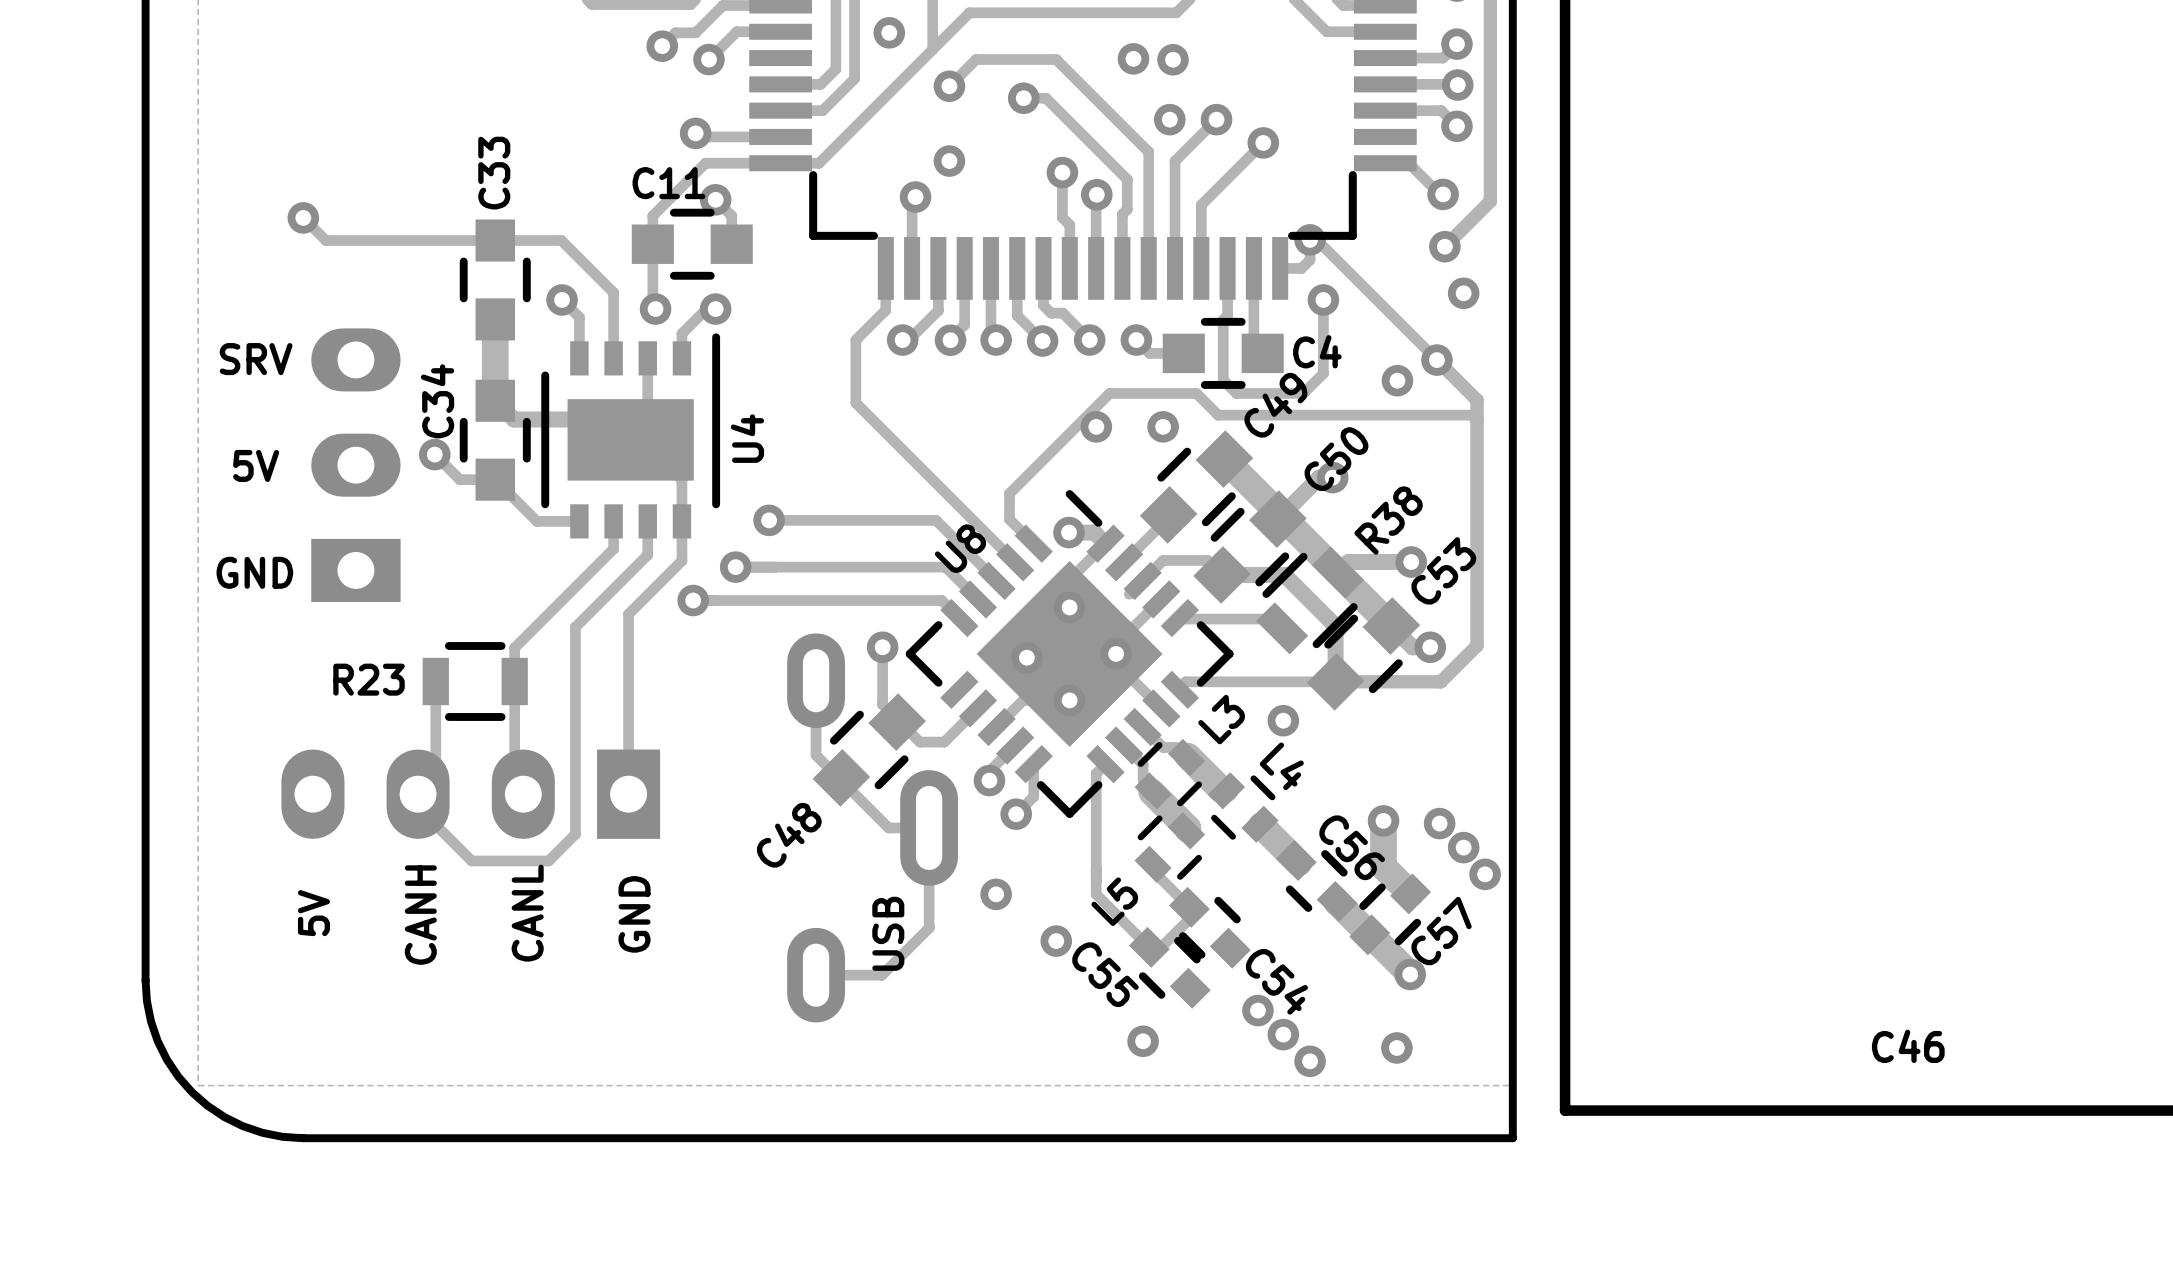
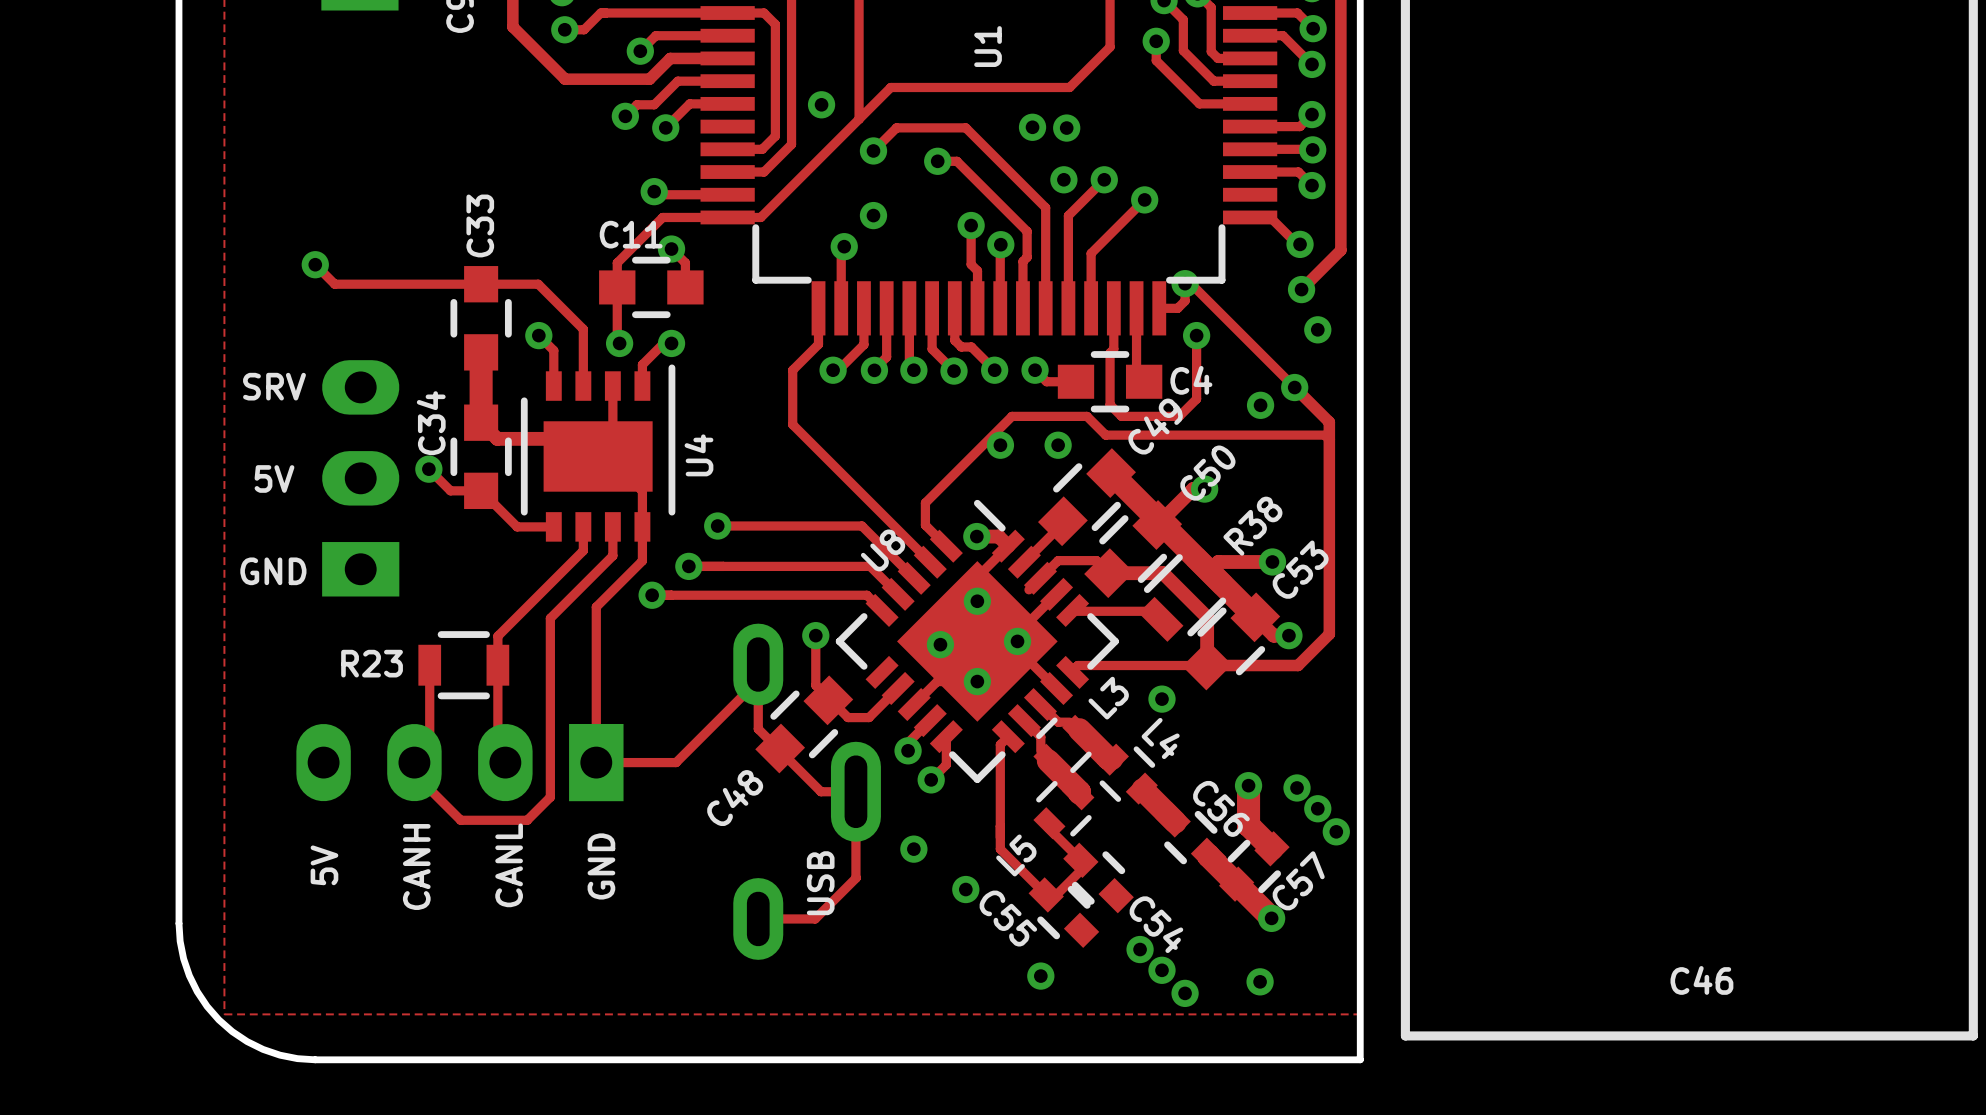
track: none -> (758, 680) (676, 762) (596, 762)

